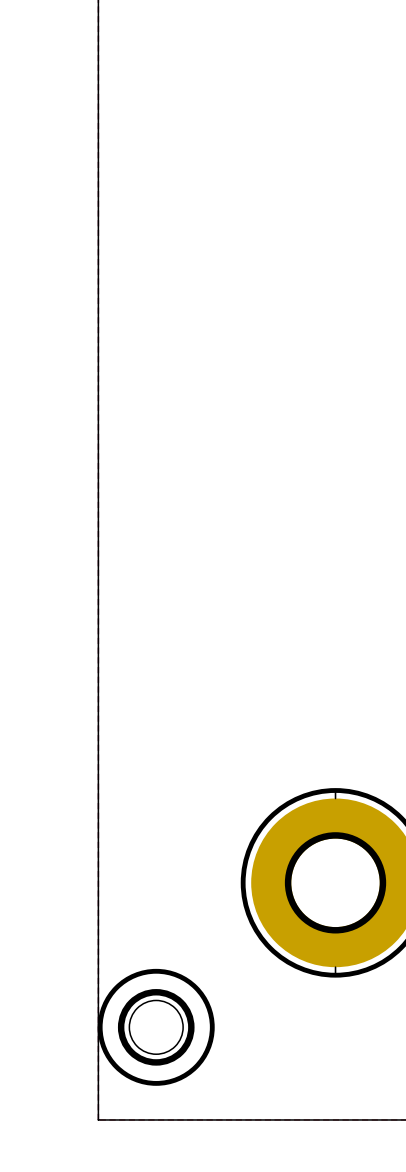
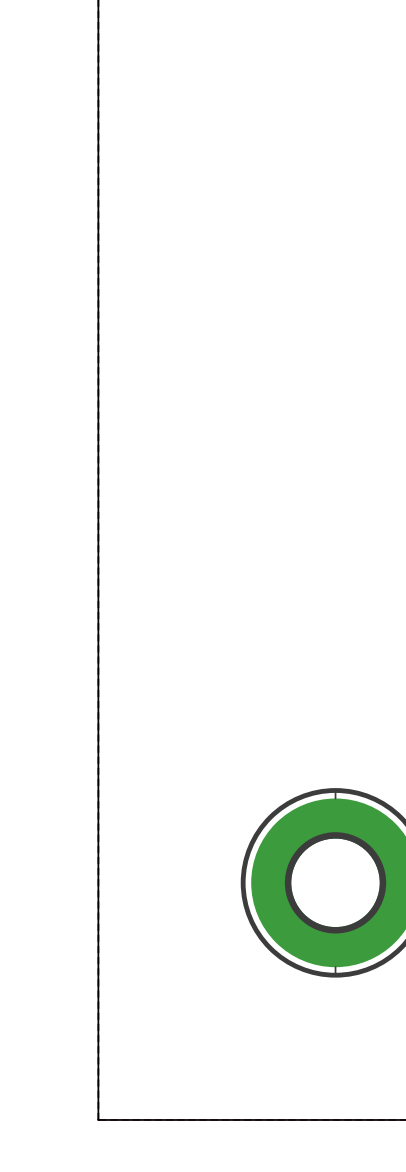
part: (156, 1027) -> none

